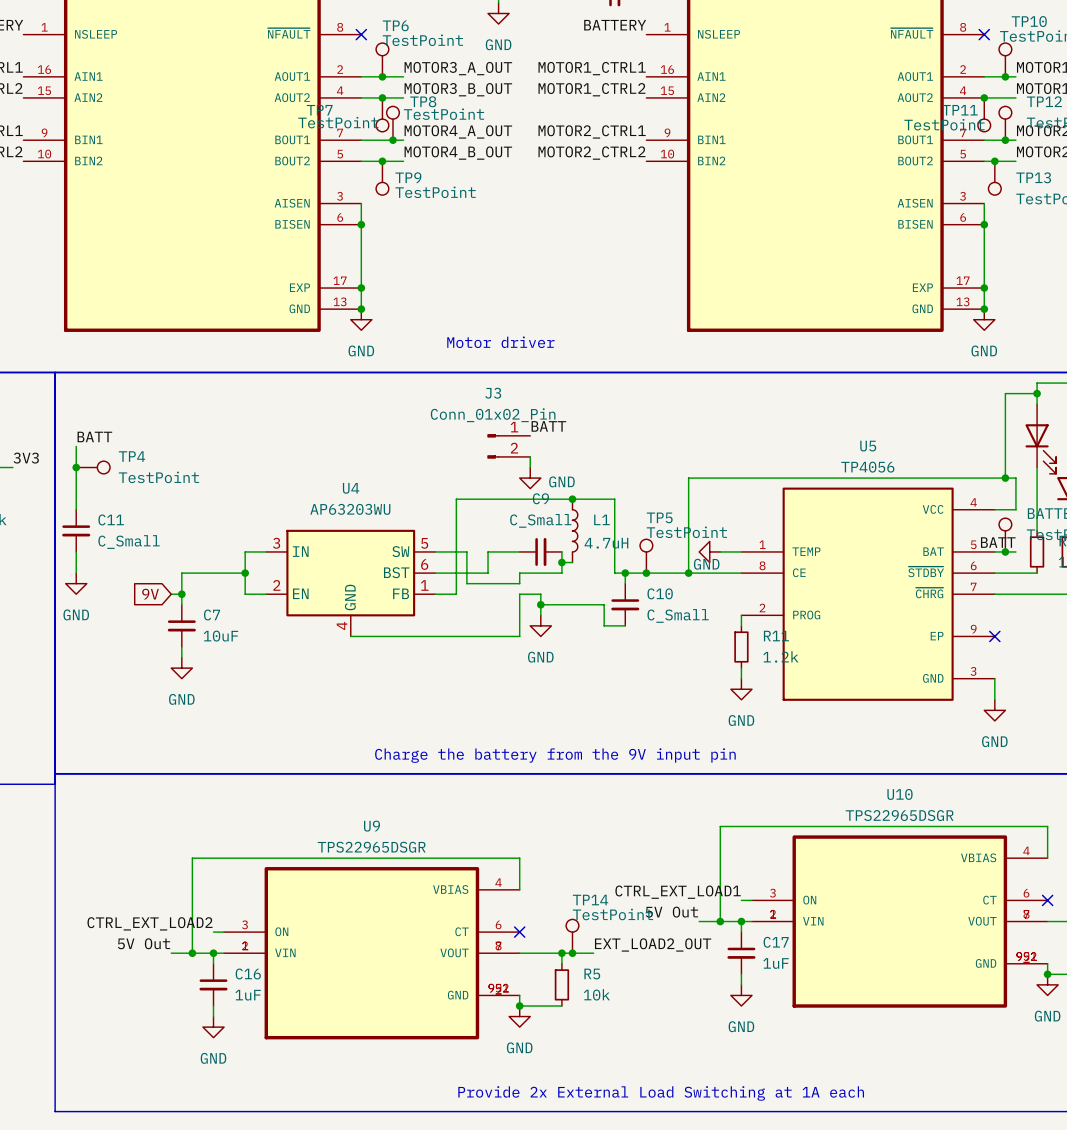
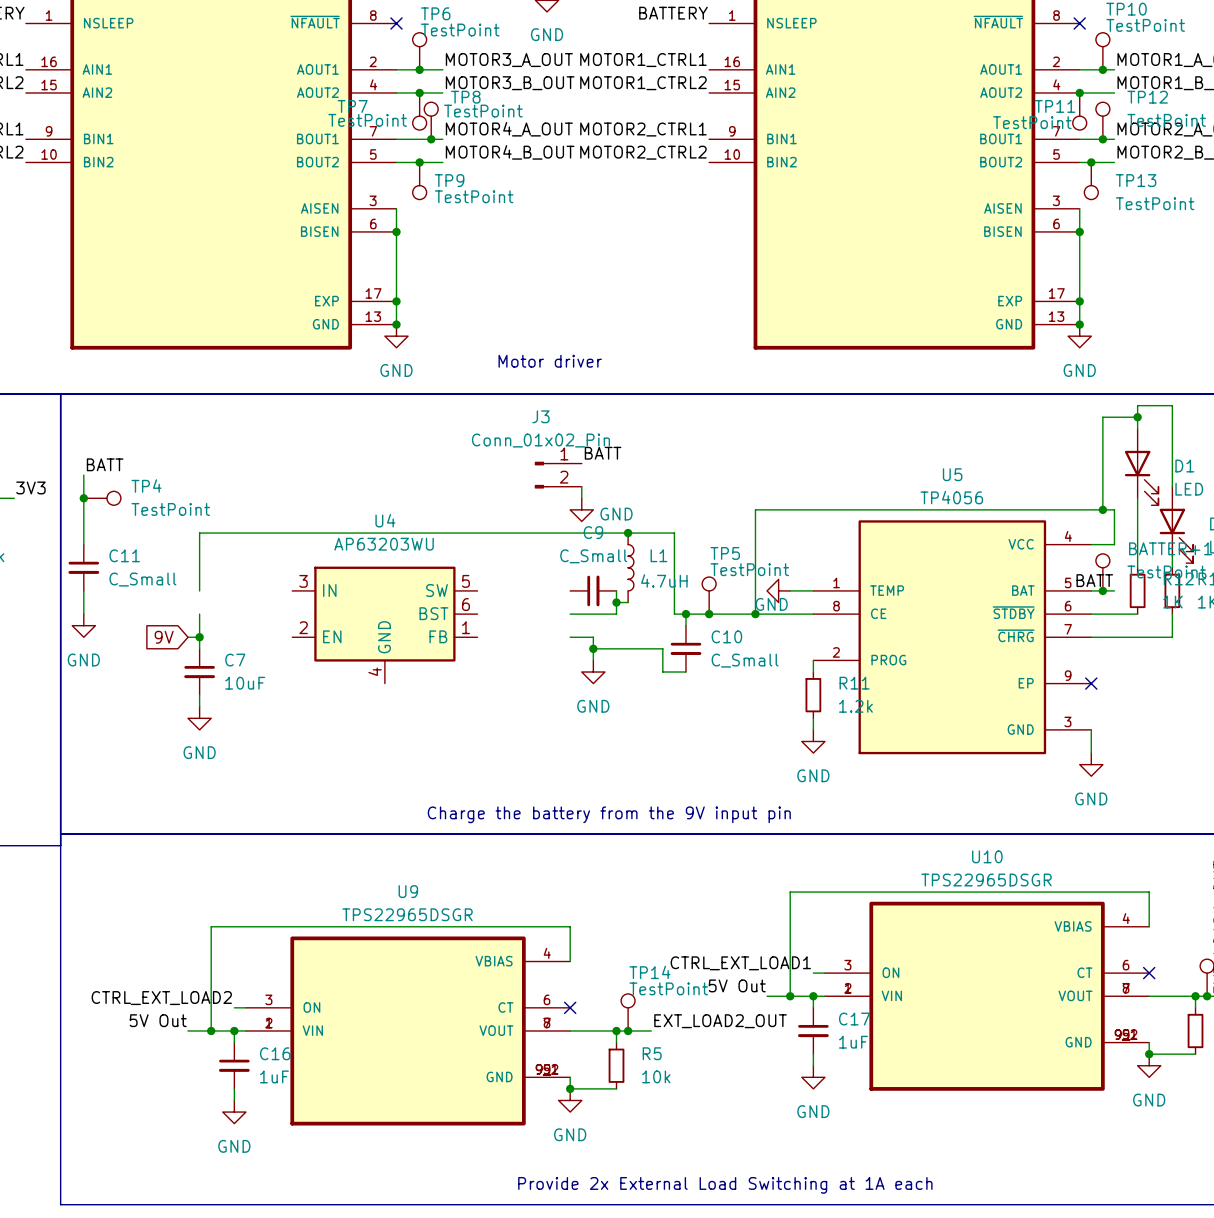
wire: (456, 499) (456, 594) (435, 594) -> (500, 533) (199, 533) (199, 590)
wire: (266, 551) (245, 551) (245, 594) (266, 594) -> none
wire: (435, 551) (466, 551) (466, 583) (519, 583) (519, 573) -> none
wire: (519, 551) (488, 551) (488, 573) (435, 573) -> none
wire: (181, 573) (245, 573) -> none
junction: (245, 573) -> none
wire: (519, 594) (519, 636) (350, 636) -> none

